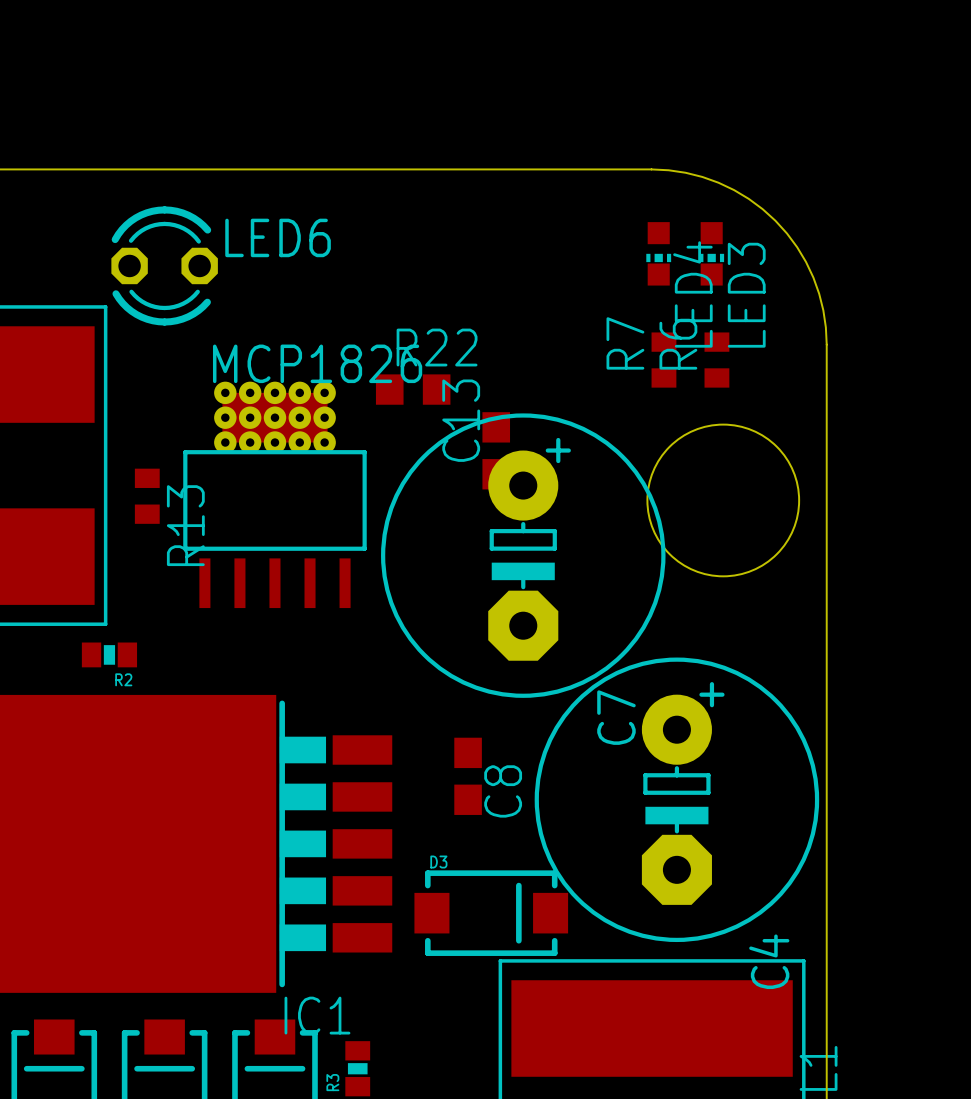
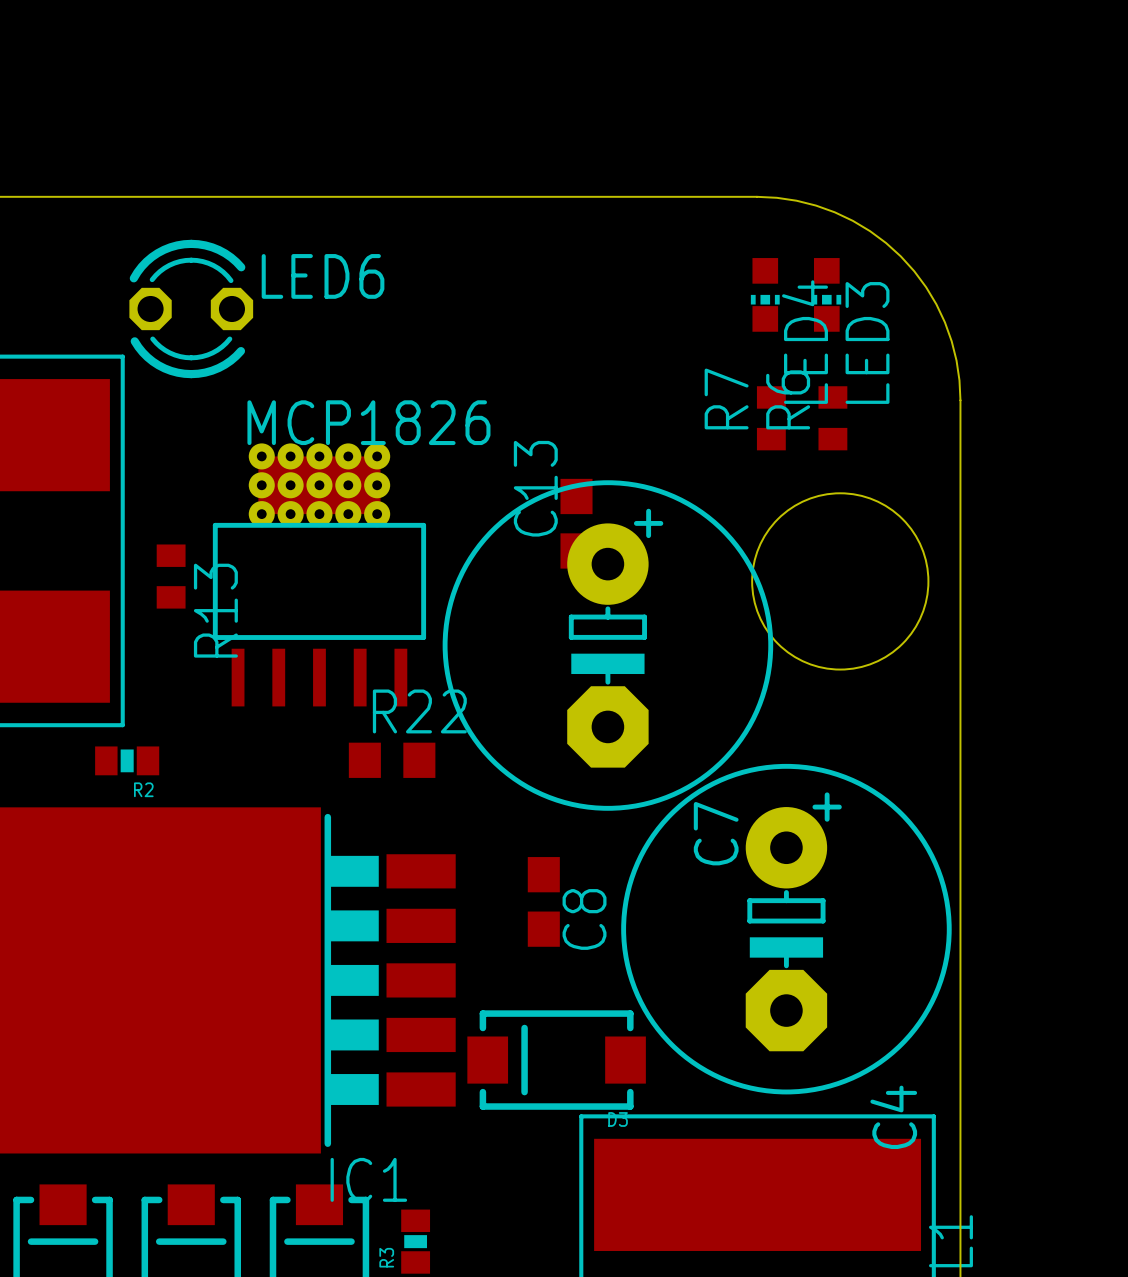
R22 position: (413, 389) -> (392, 760)
D3 rotation: 0° (491, 913) -> 180° (556, 1060)

